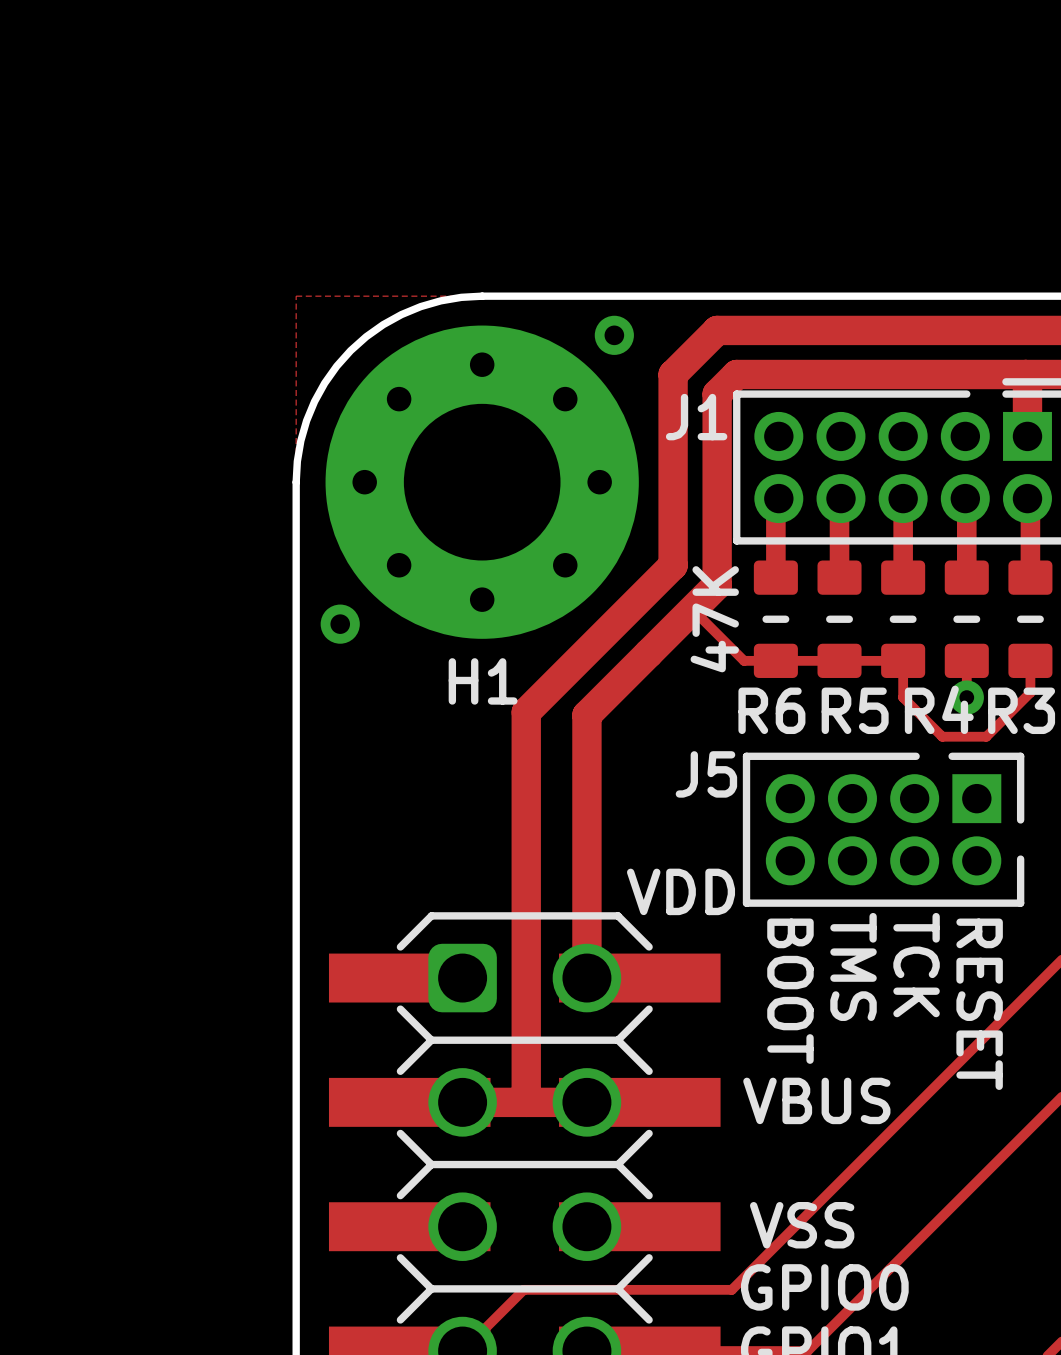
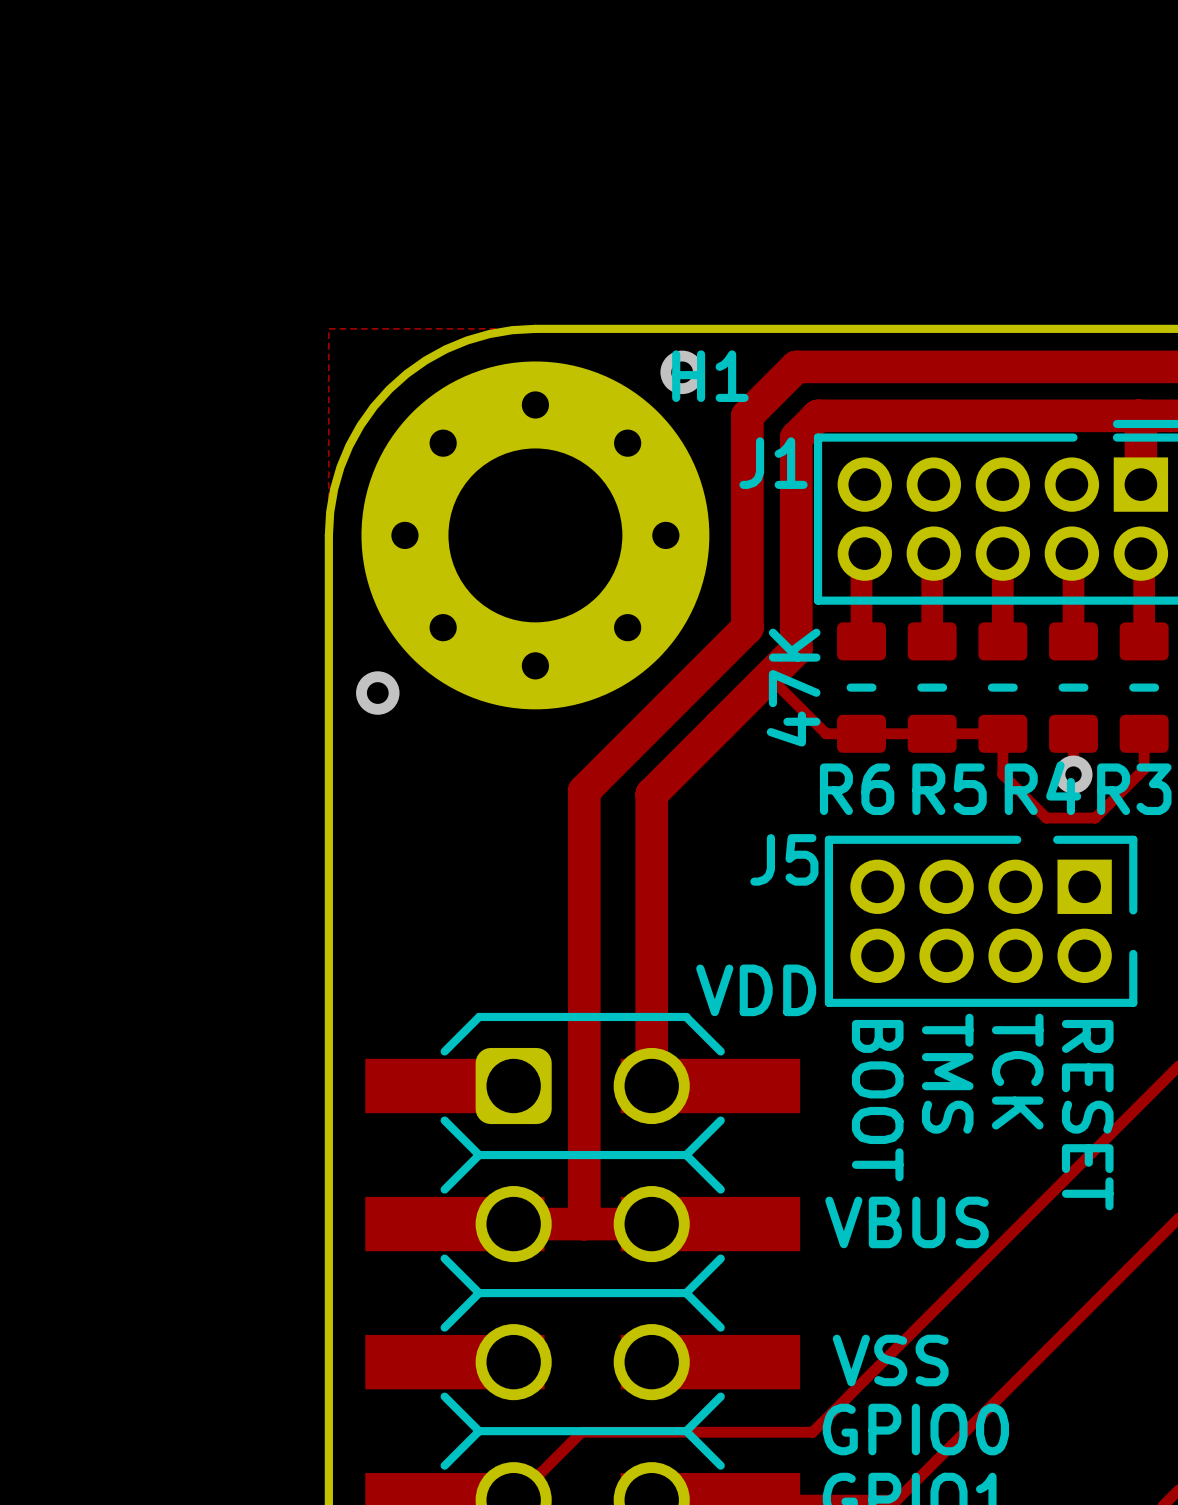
H1 name position: H1 (483, 681) -> H1 (710, 376)

